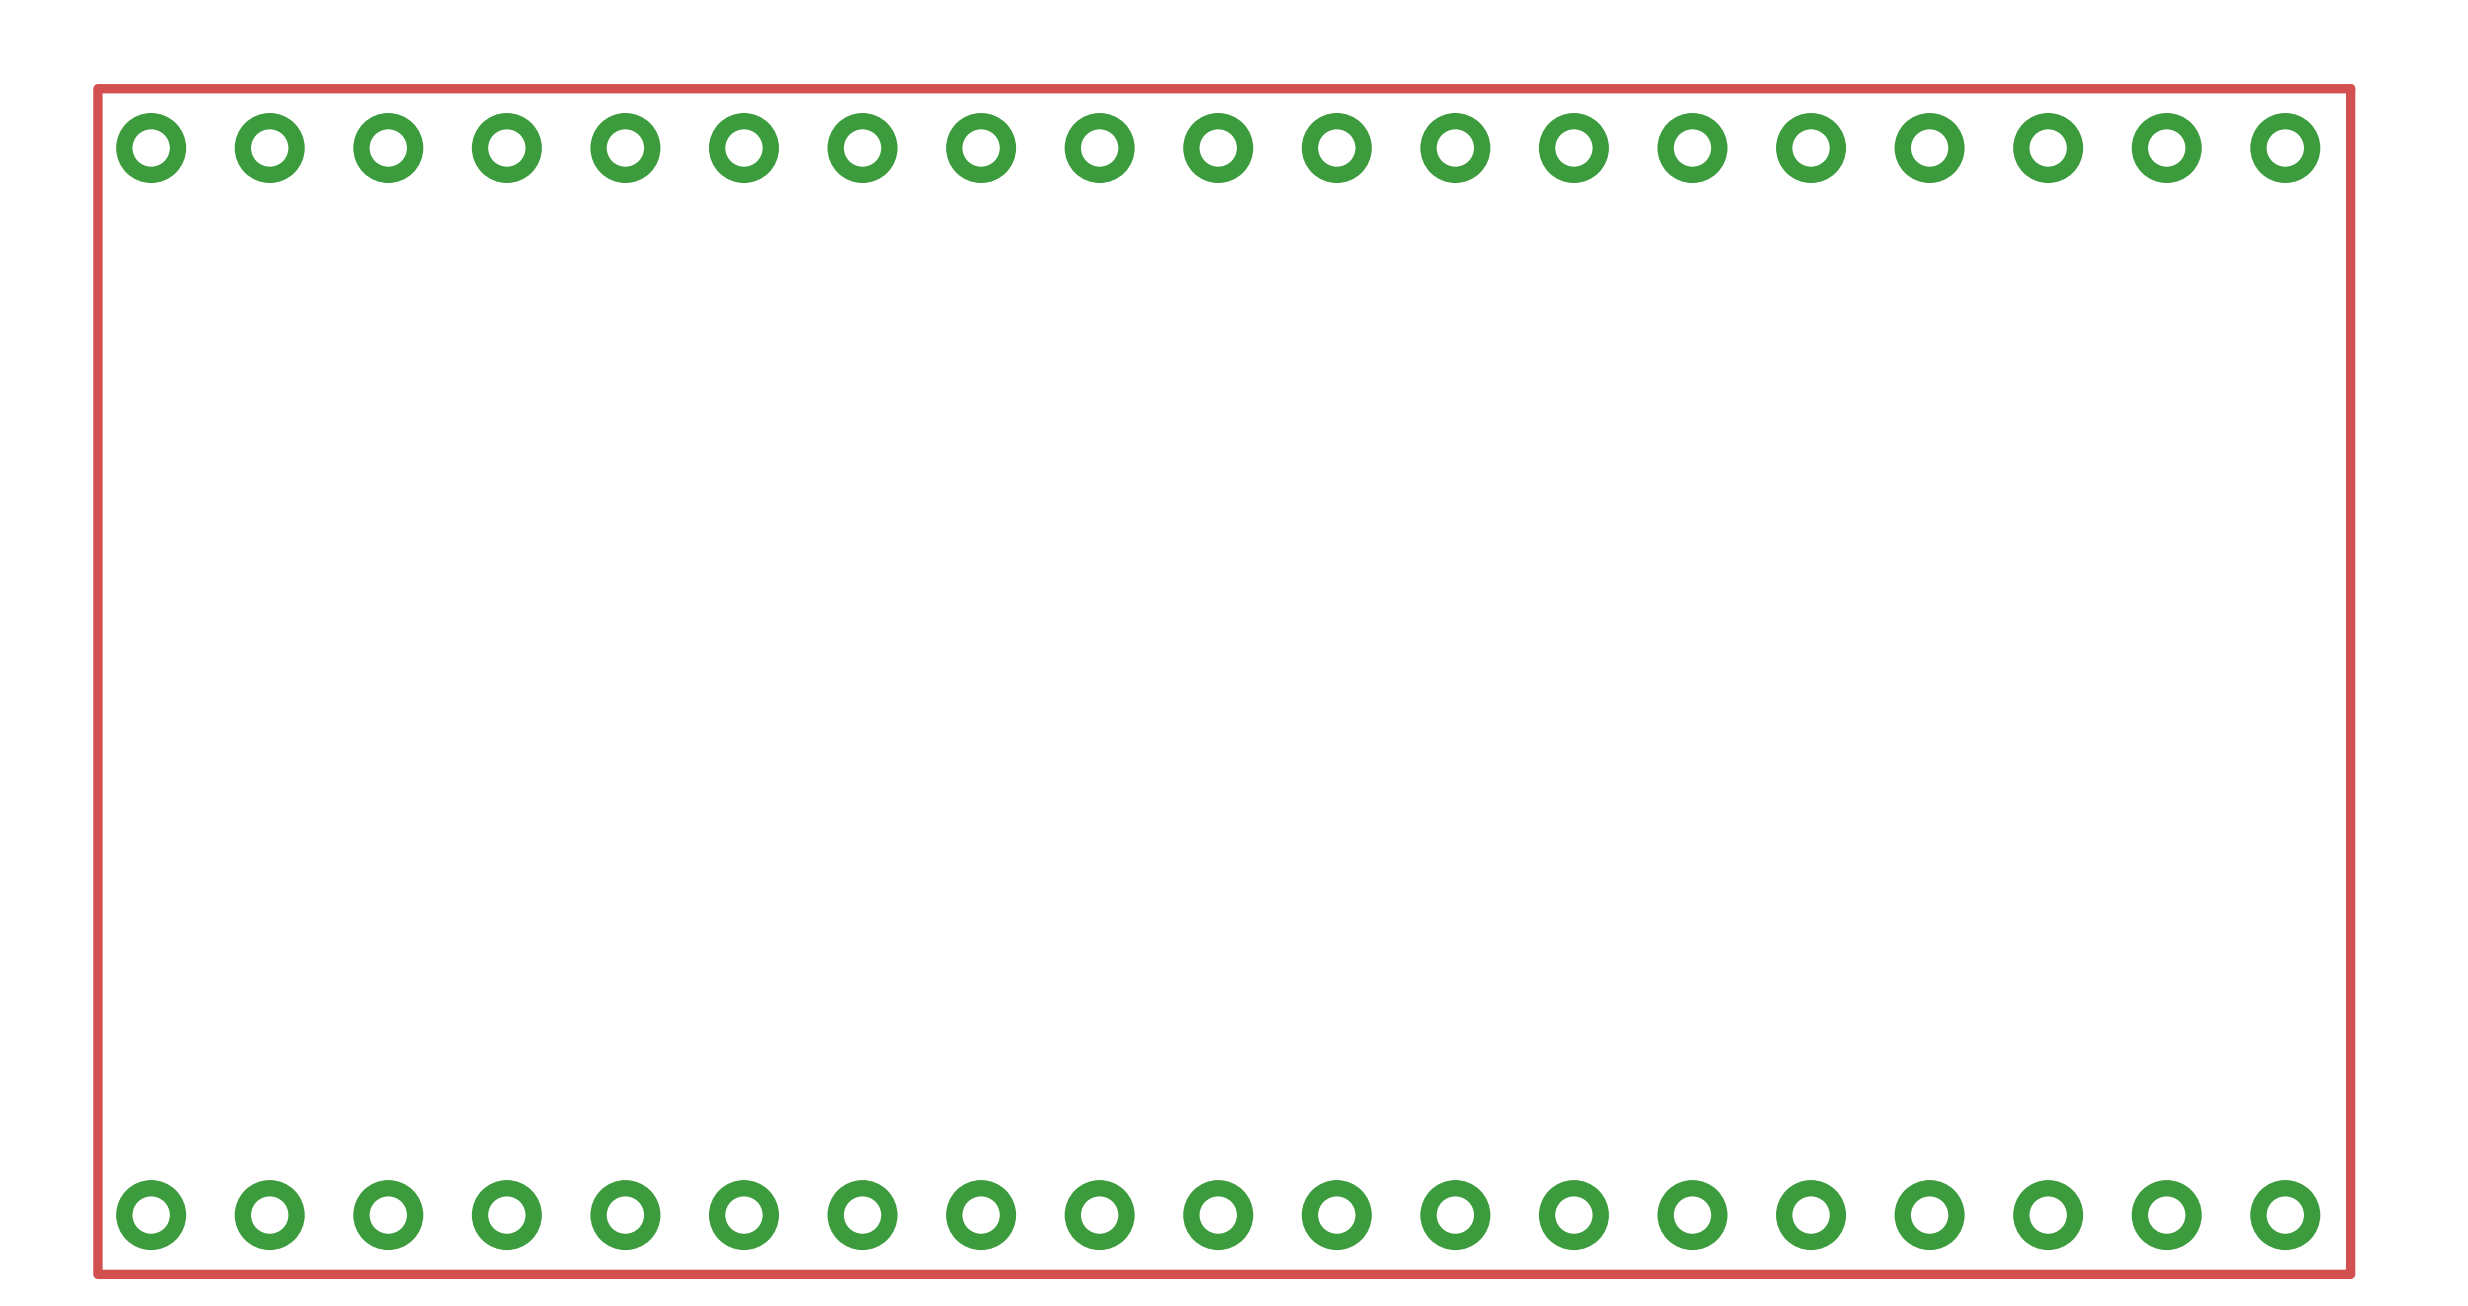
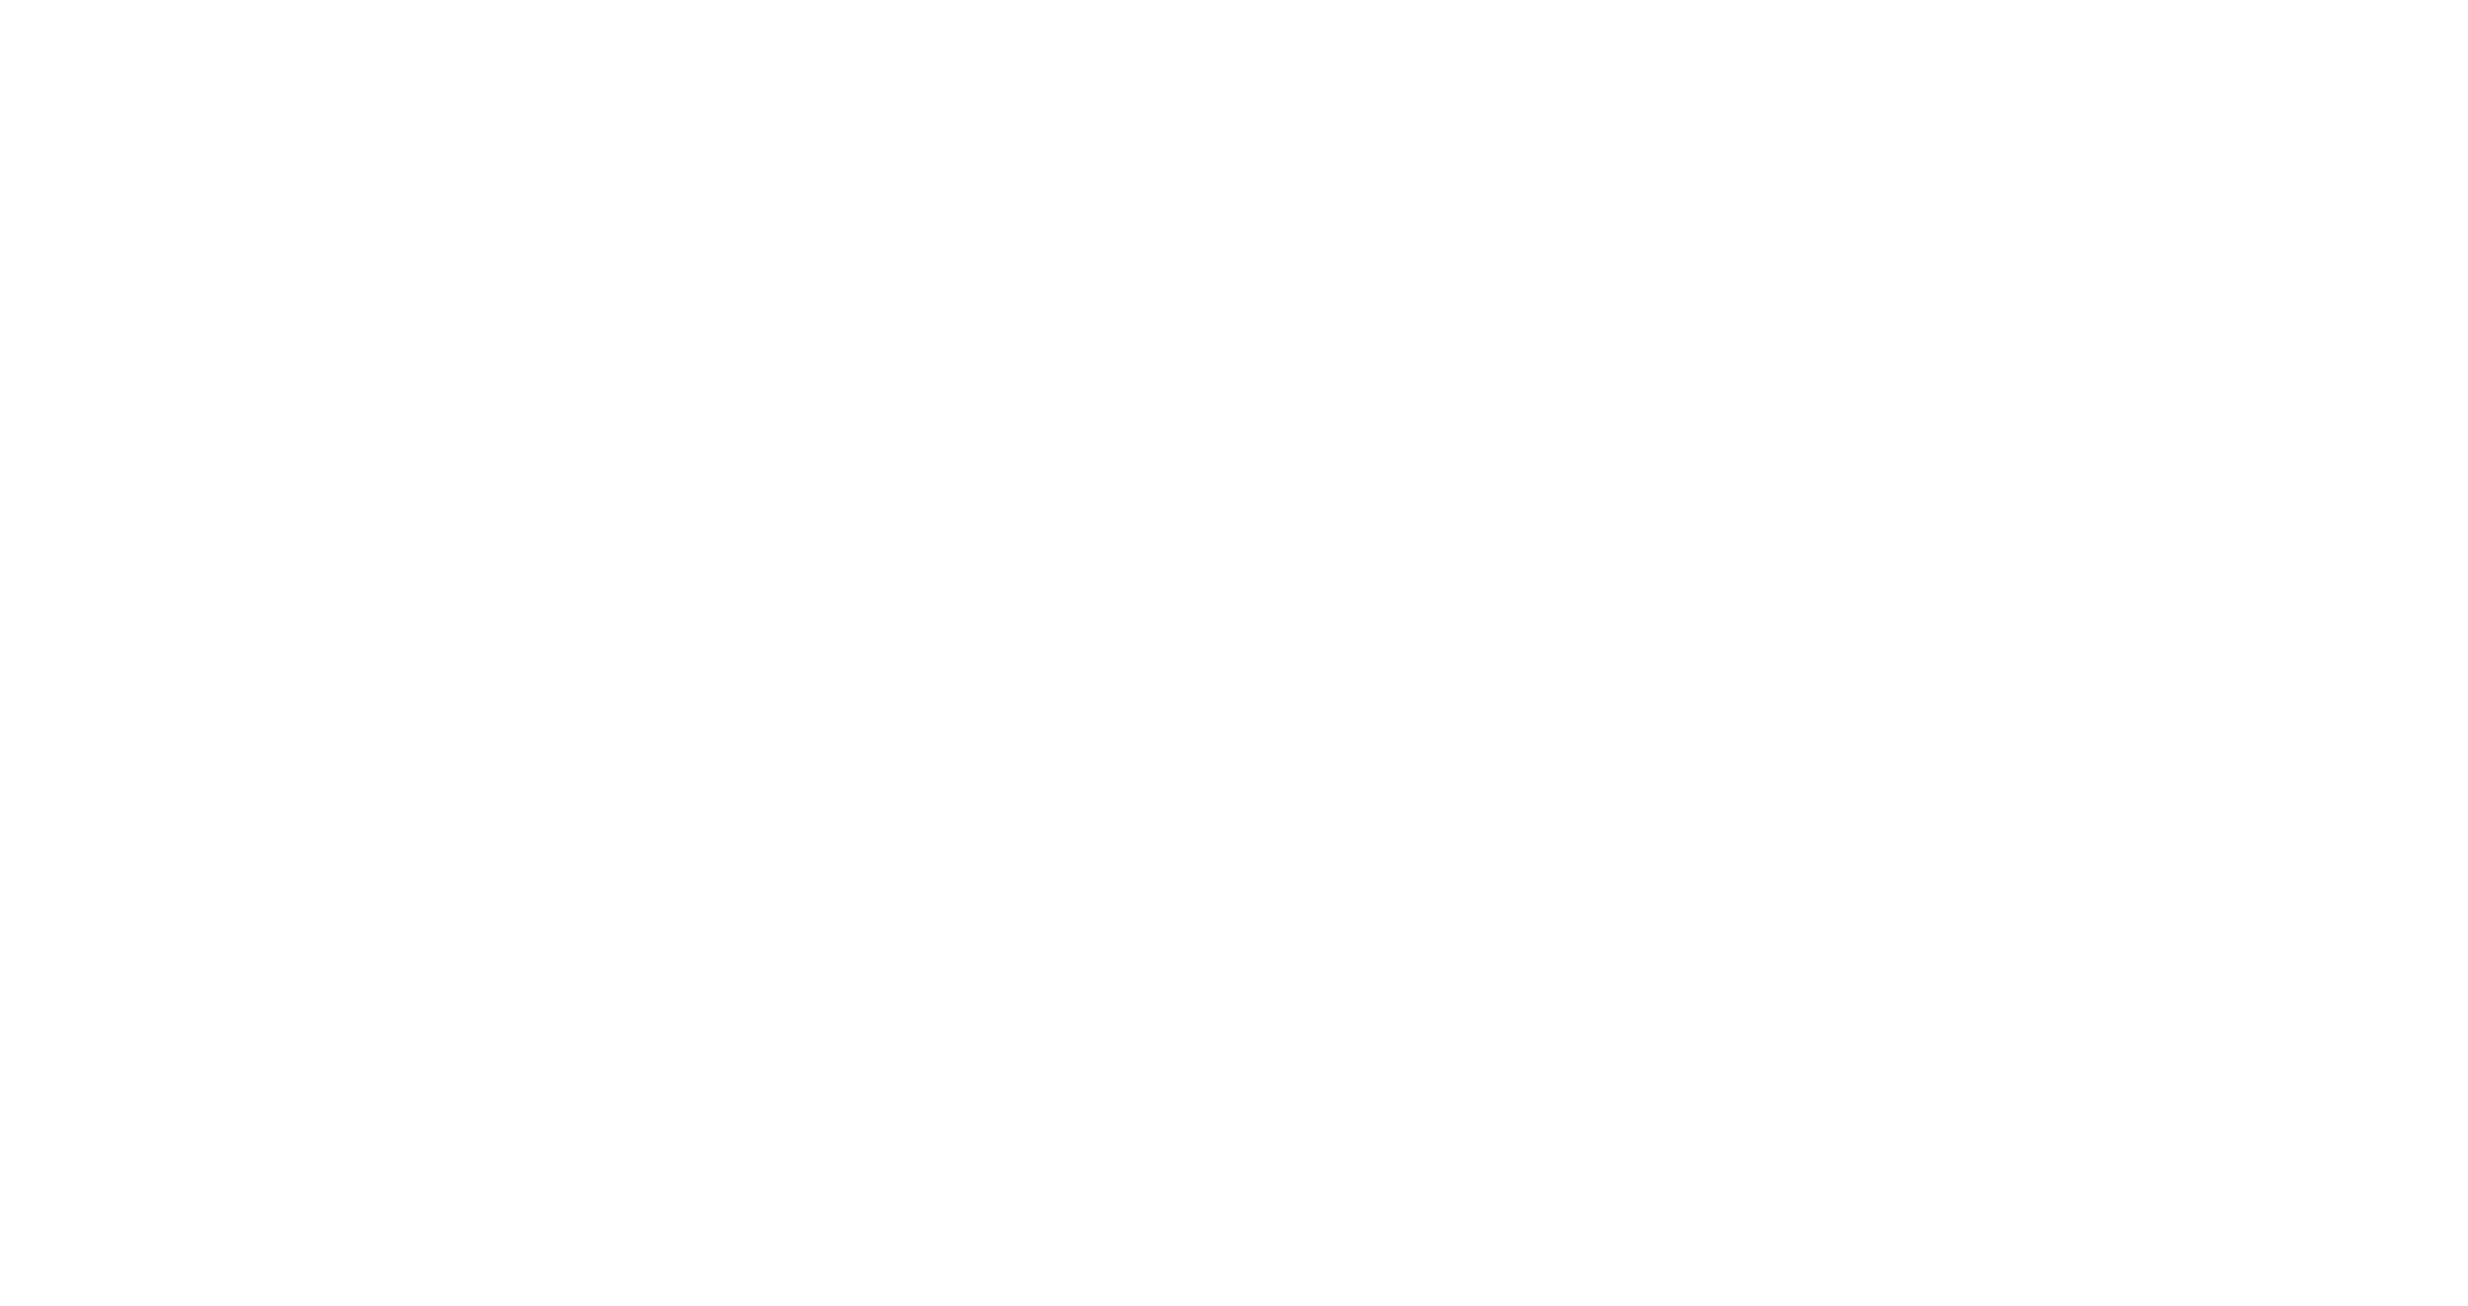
part: (1224, 681) -> none

